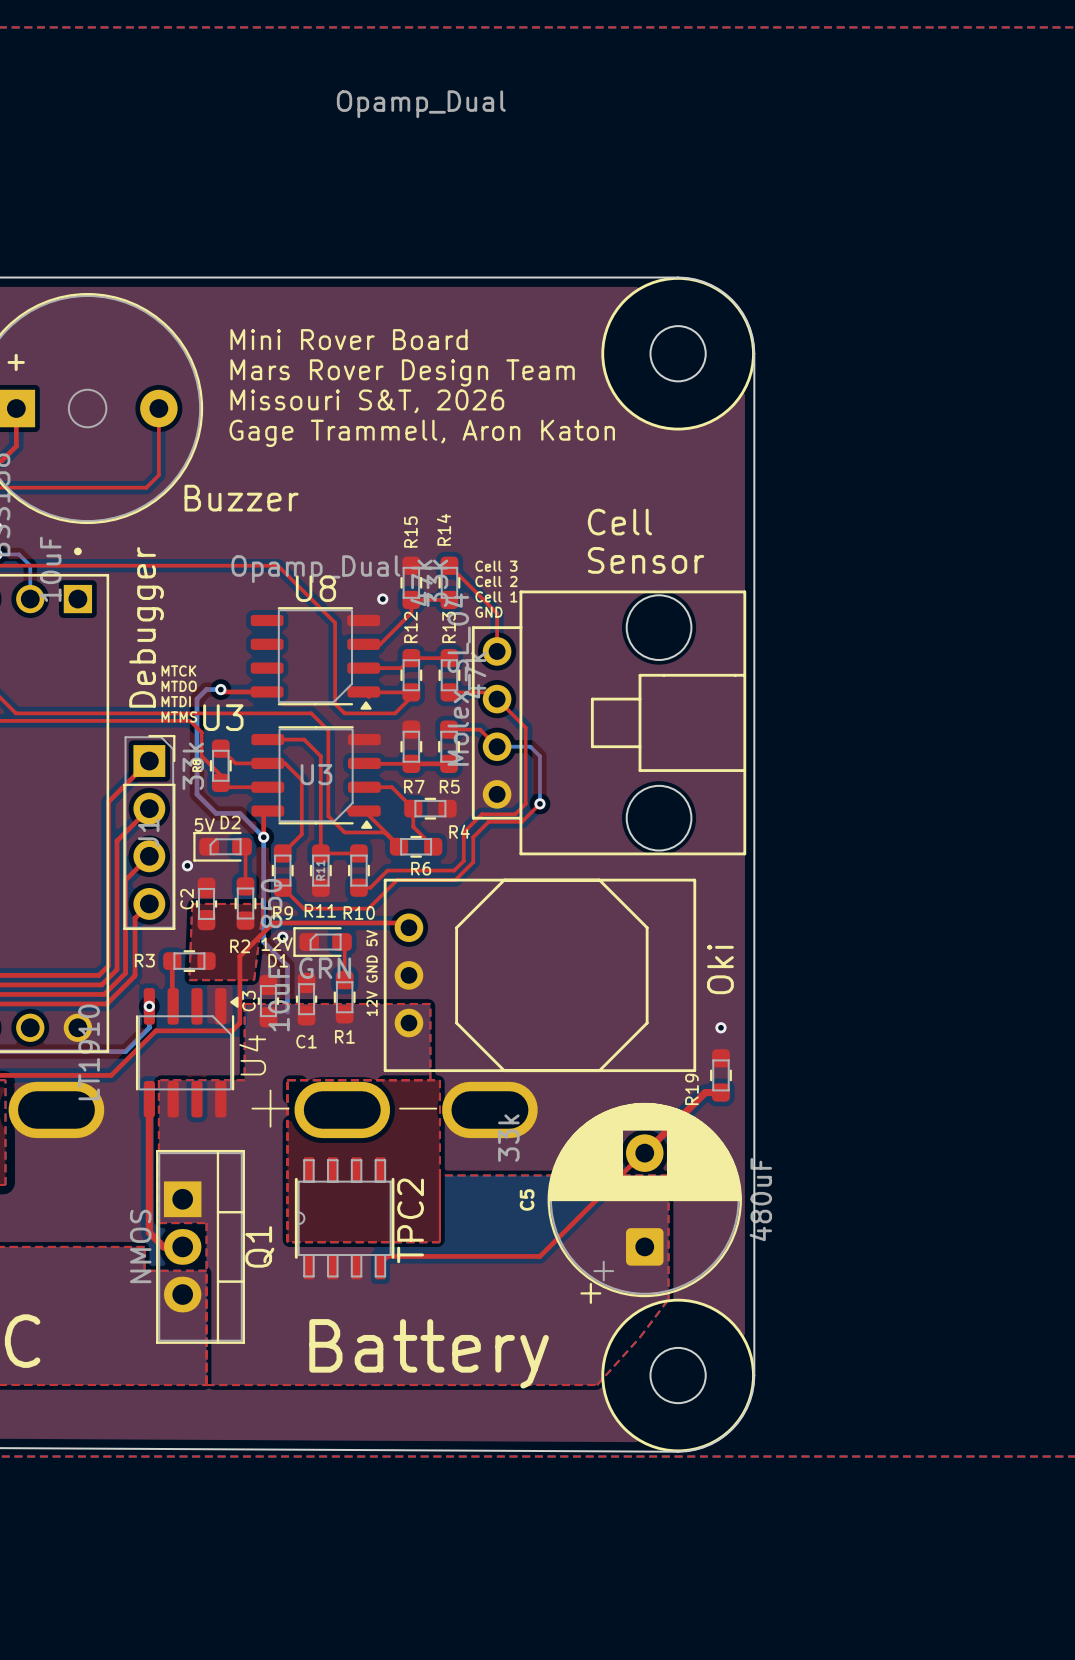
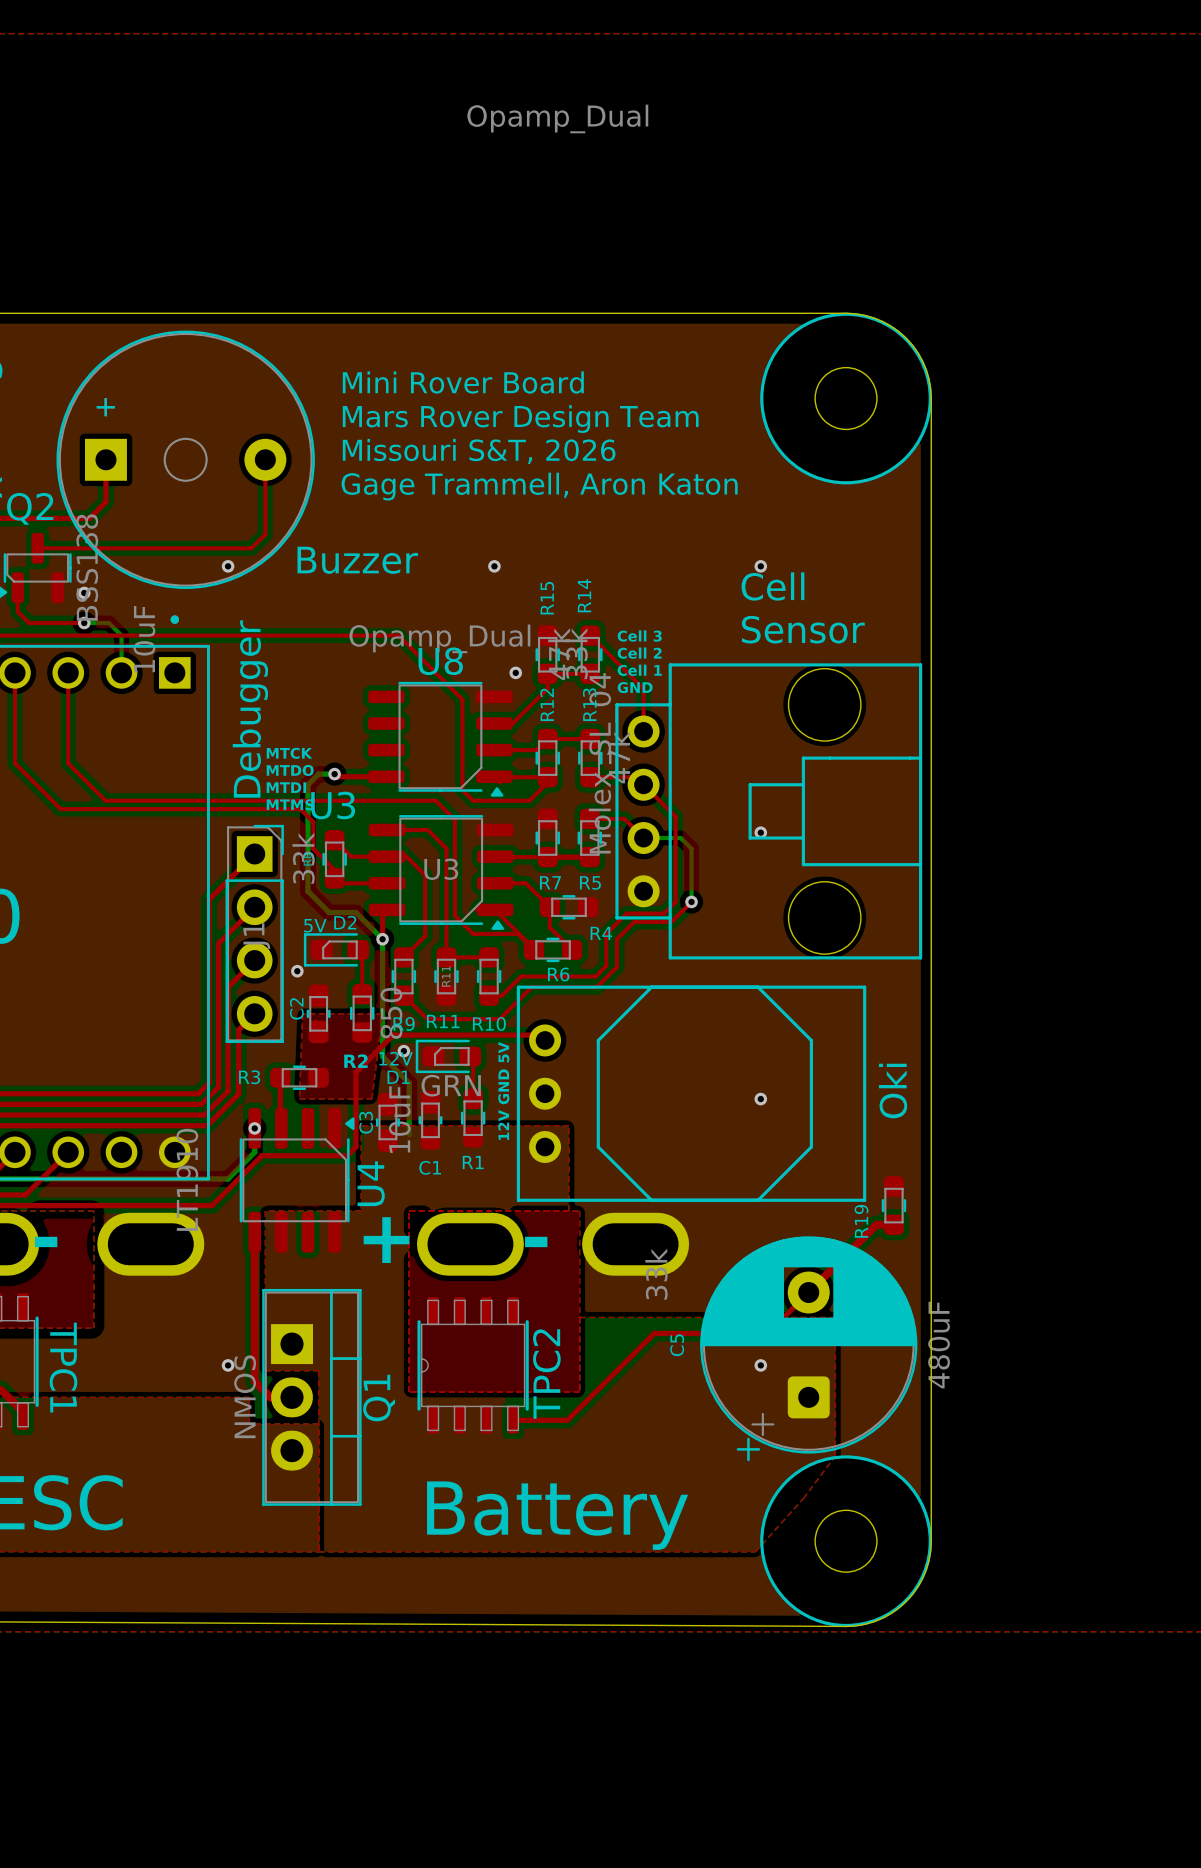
via: none -> (228, 566)
via: none -> (494, 566)
via: none -> (760, 566)
via: none -> (760, 832)
via: none -> (760, 1099)
via: (720, 1027) -> none
top track: (644, 1153) (539, 1256) (387, 1256) (380, 1263) (380, 1267) -> (808, 1292) (767, 1333) (654, 1333) (567, 1420) (513, 1420)
via: none -> (228, 1365)
via: none -> (760, 1365)

